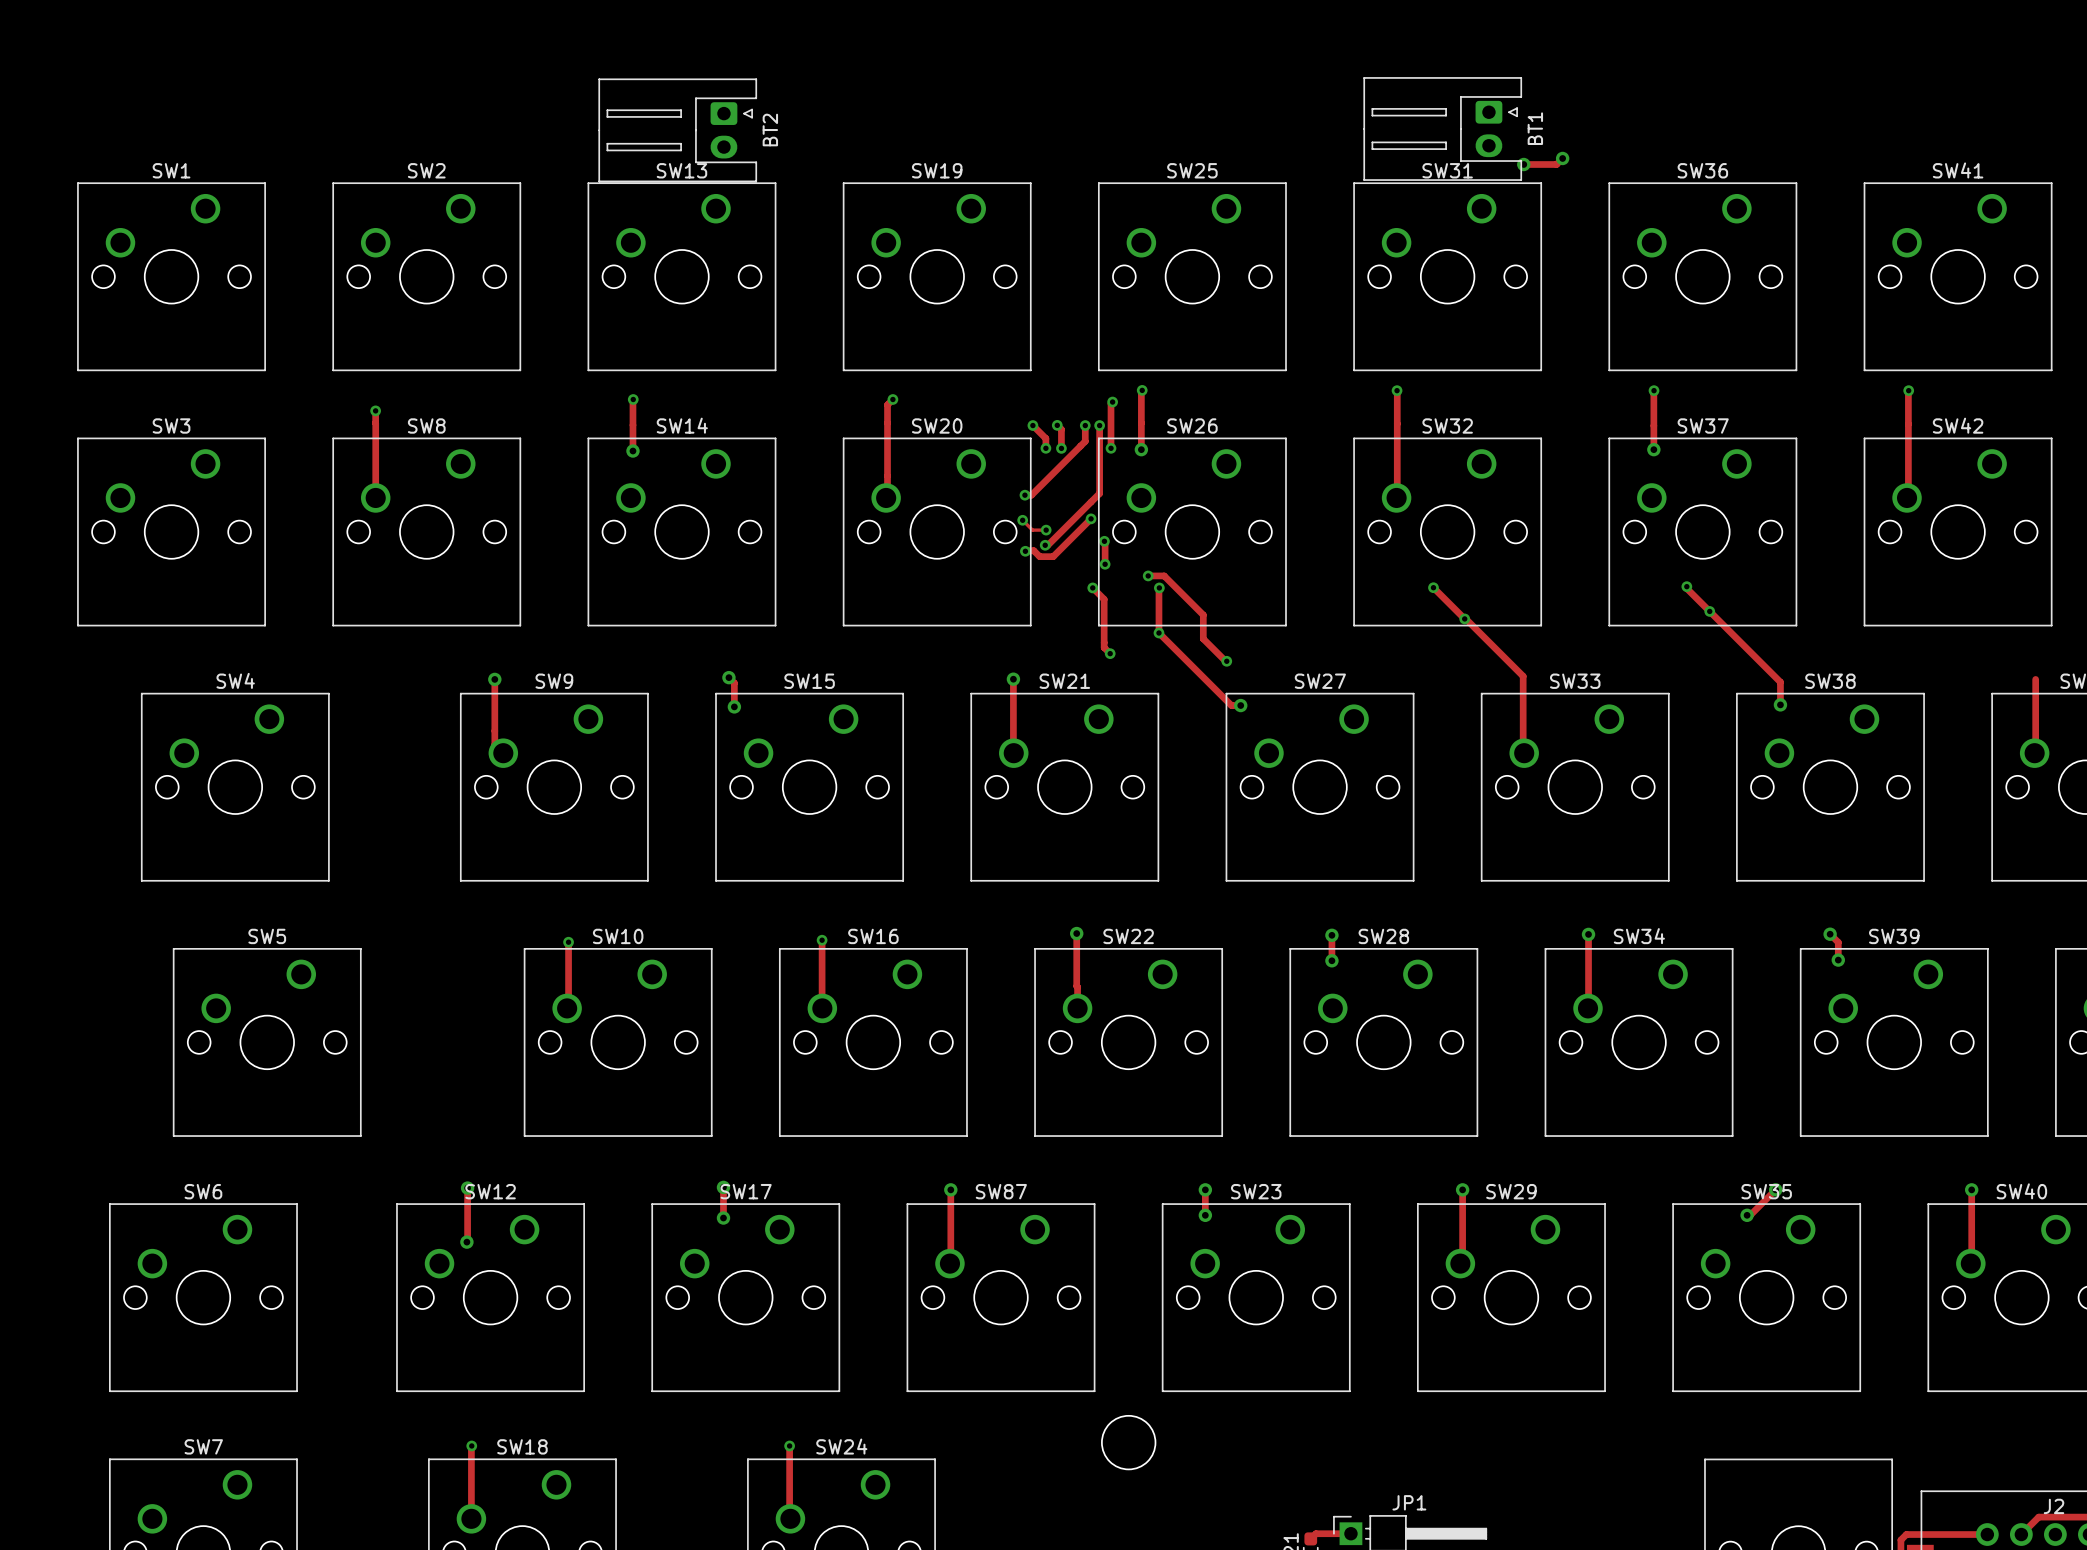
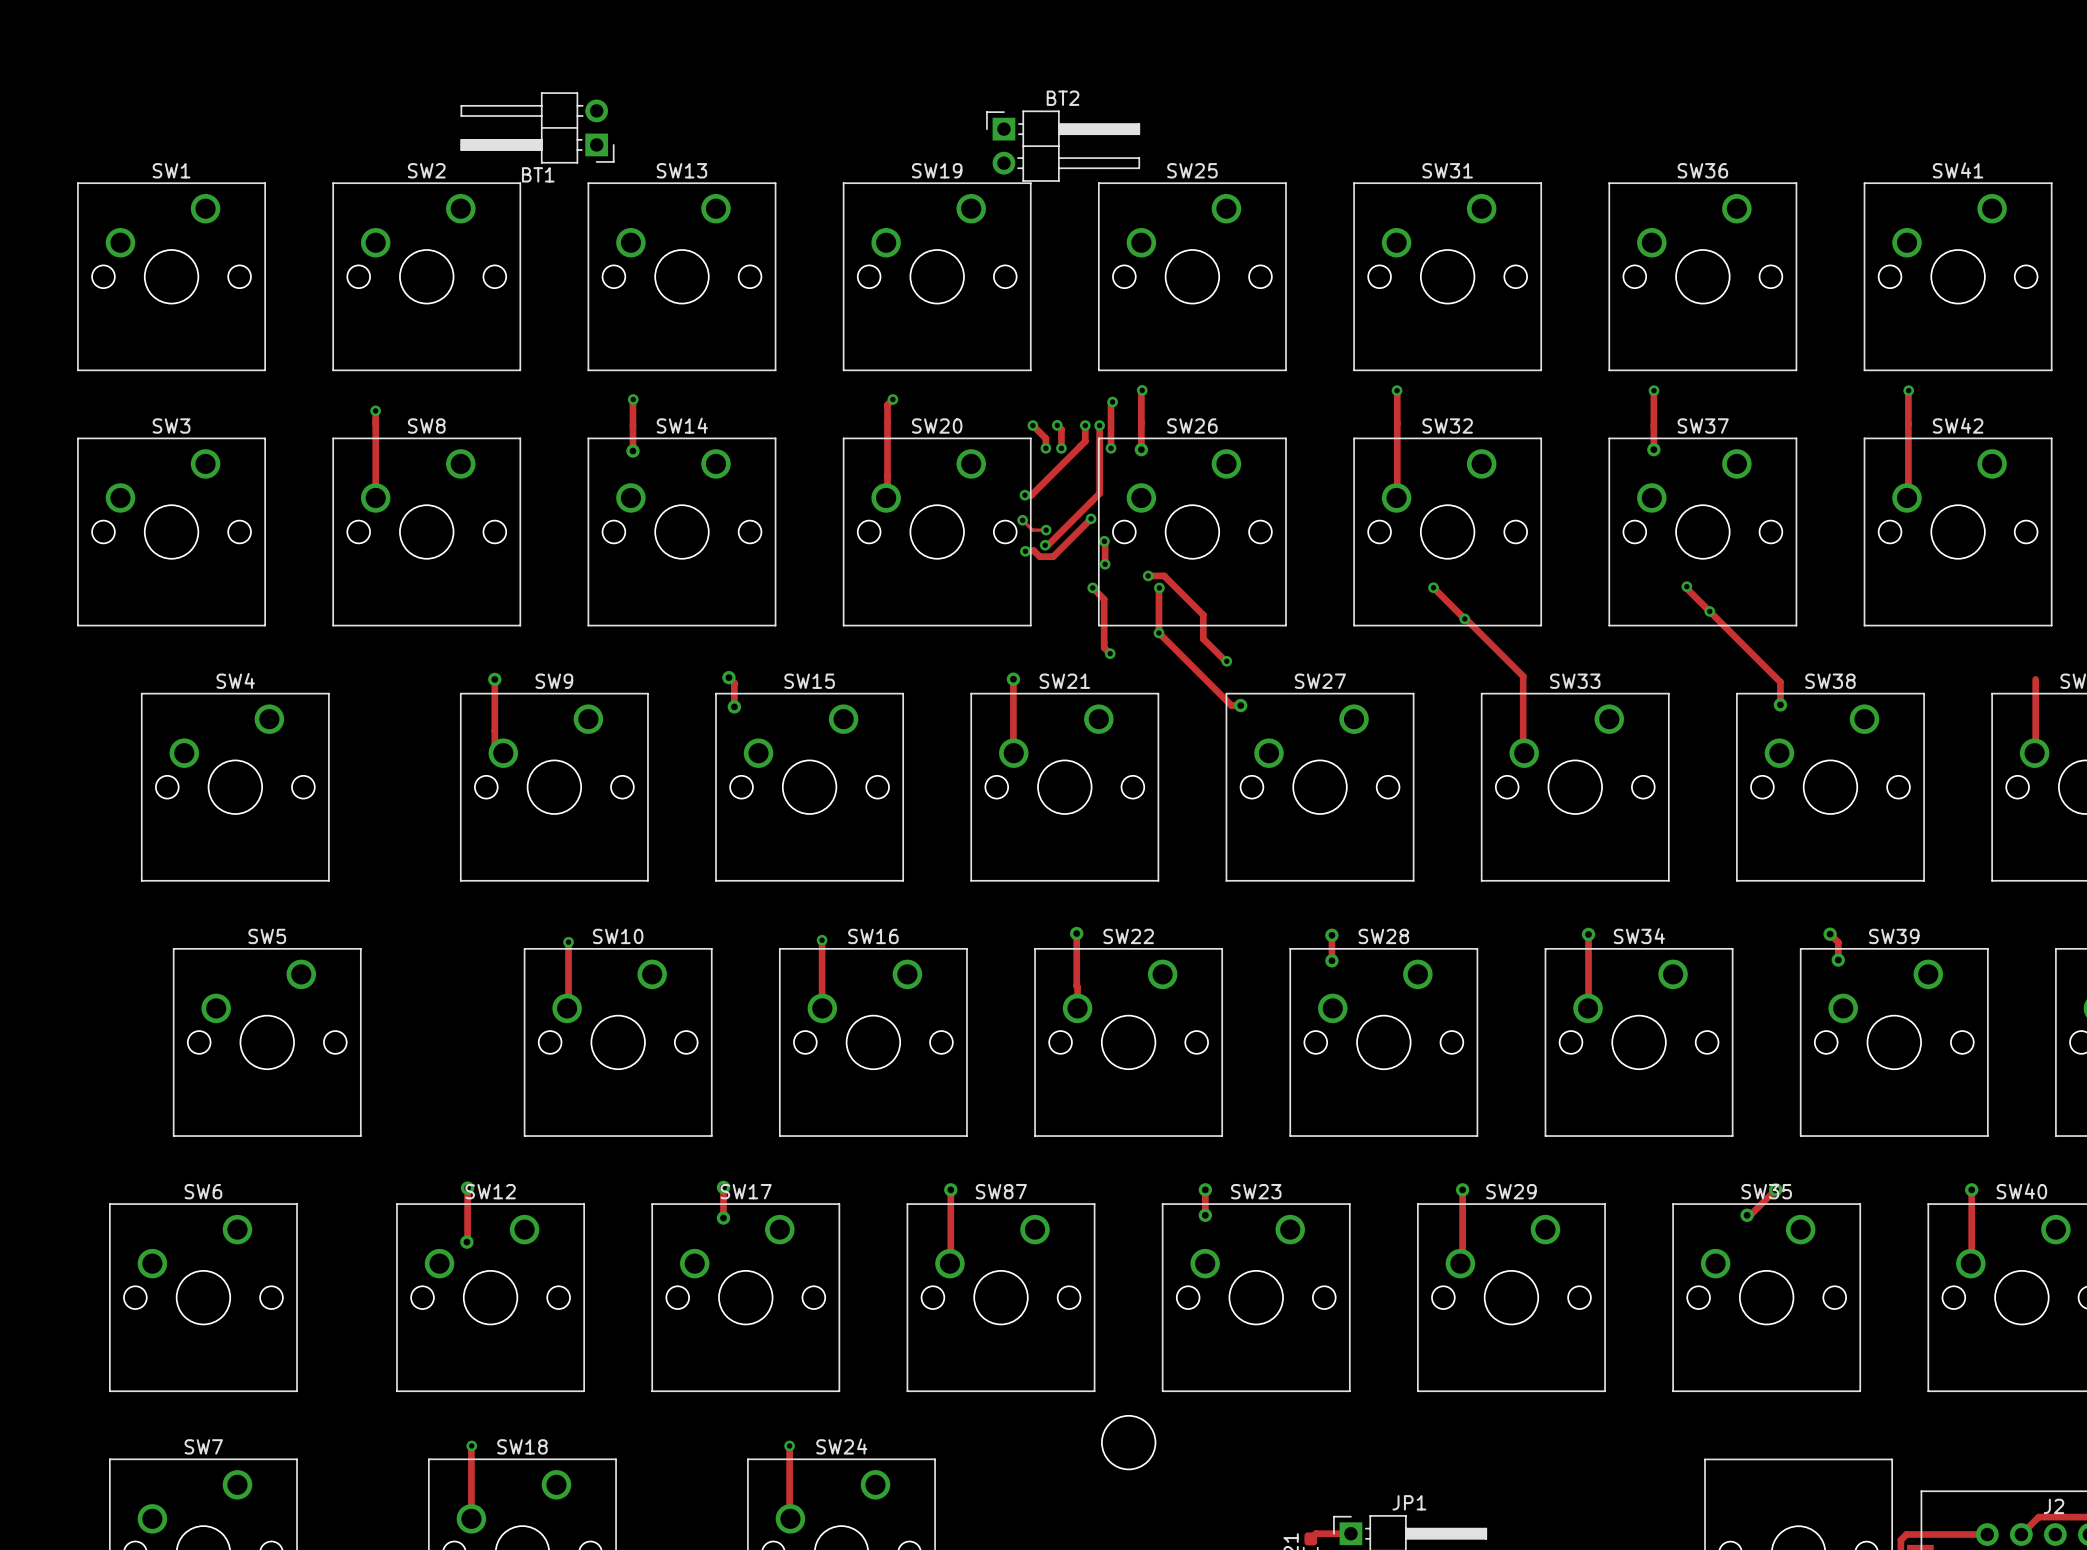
BT1 footprint: [1363, 77, 1523, 181] -> [460, 92, 615, 164]
BT2 footprint: [598, 78, 758, 183] -> [986, 110, 1141, 182]
BT1 name position: BT1 (1535, 128) -> BT1 (538, 174)
BT2 name position: BT2 (770, 130) -> BT2 (1063, 98)
track: (1562, 158) (1556, 164) (1523, 164) -> none
via: (1562, 158) -> none
via: (1523, 164) -> none

